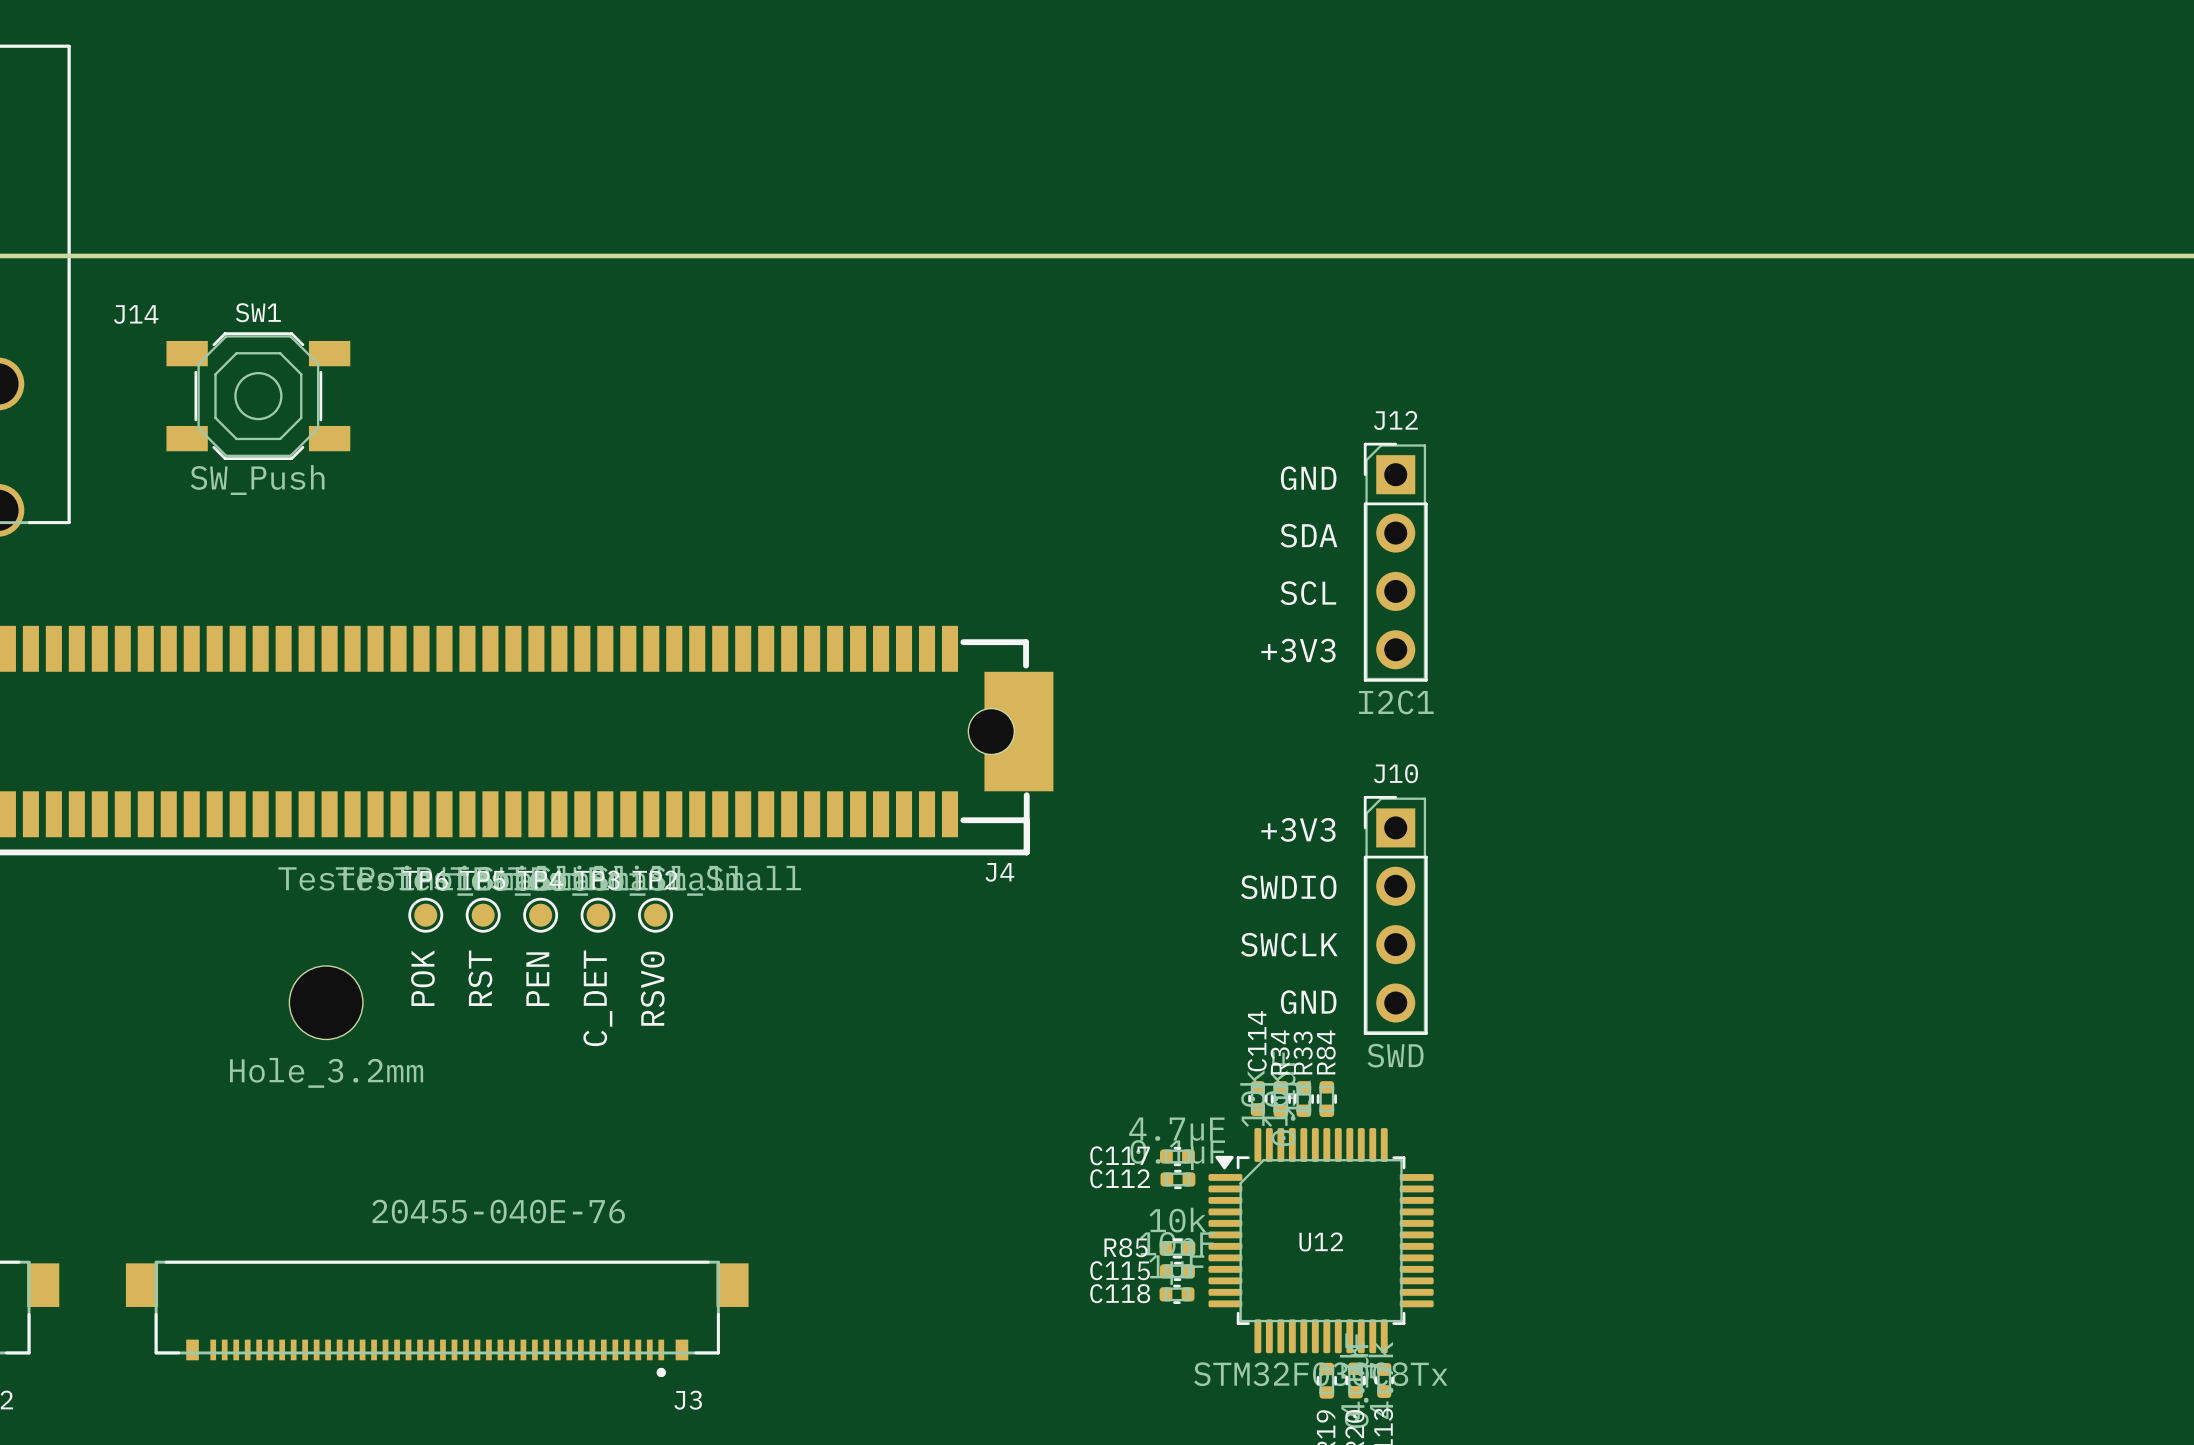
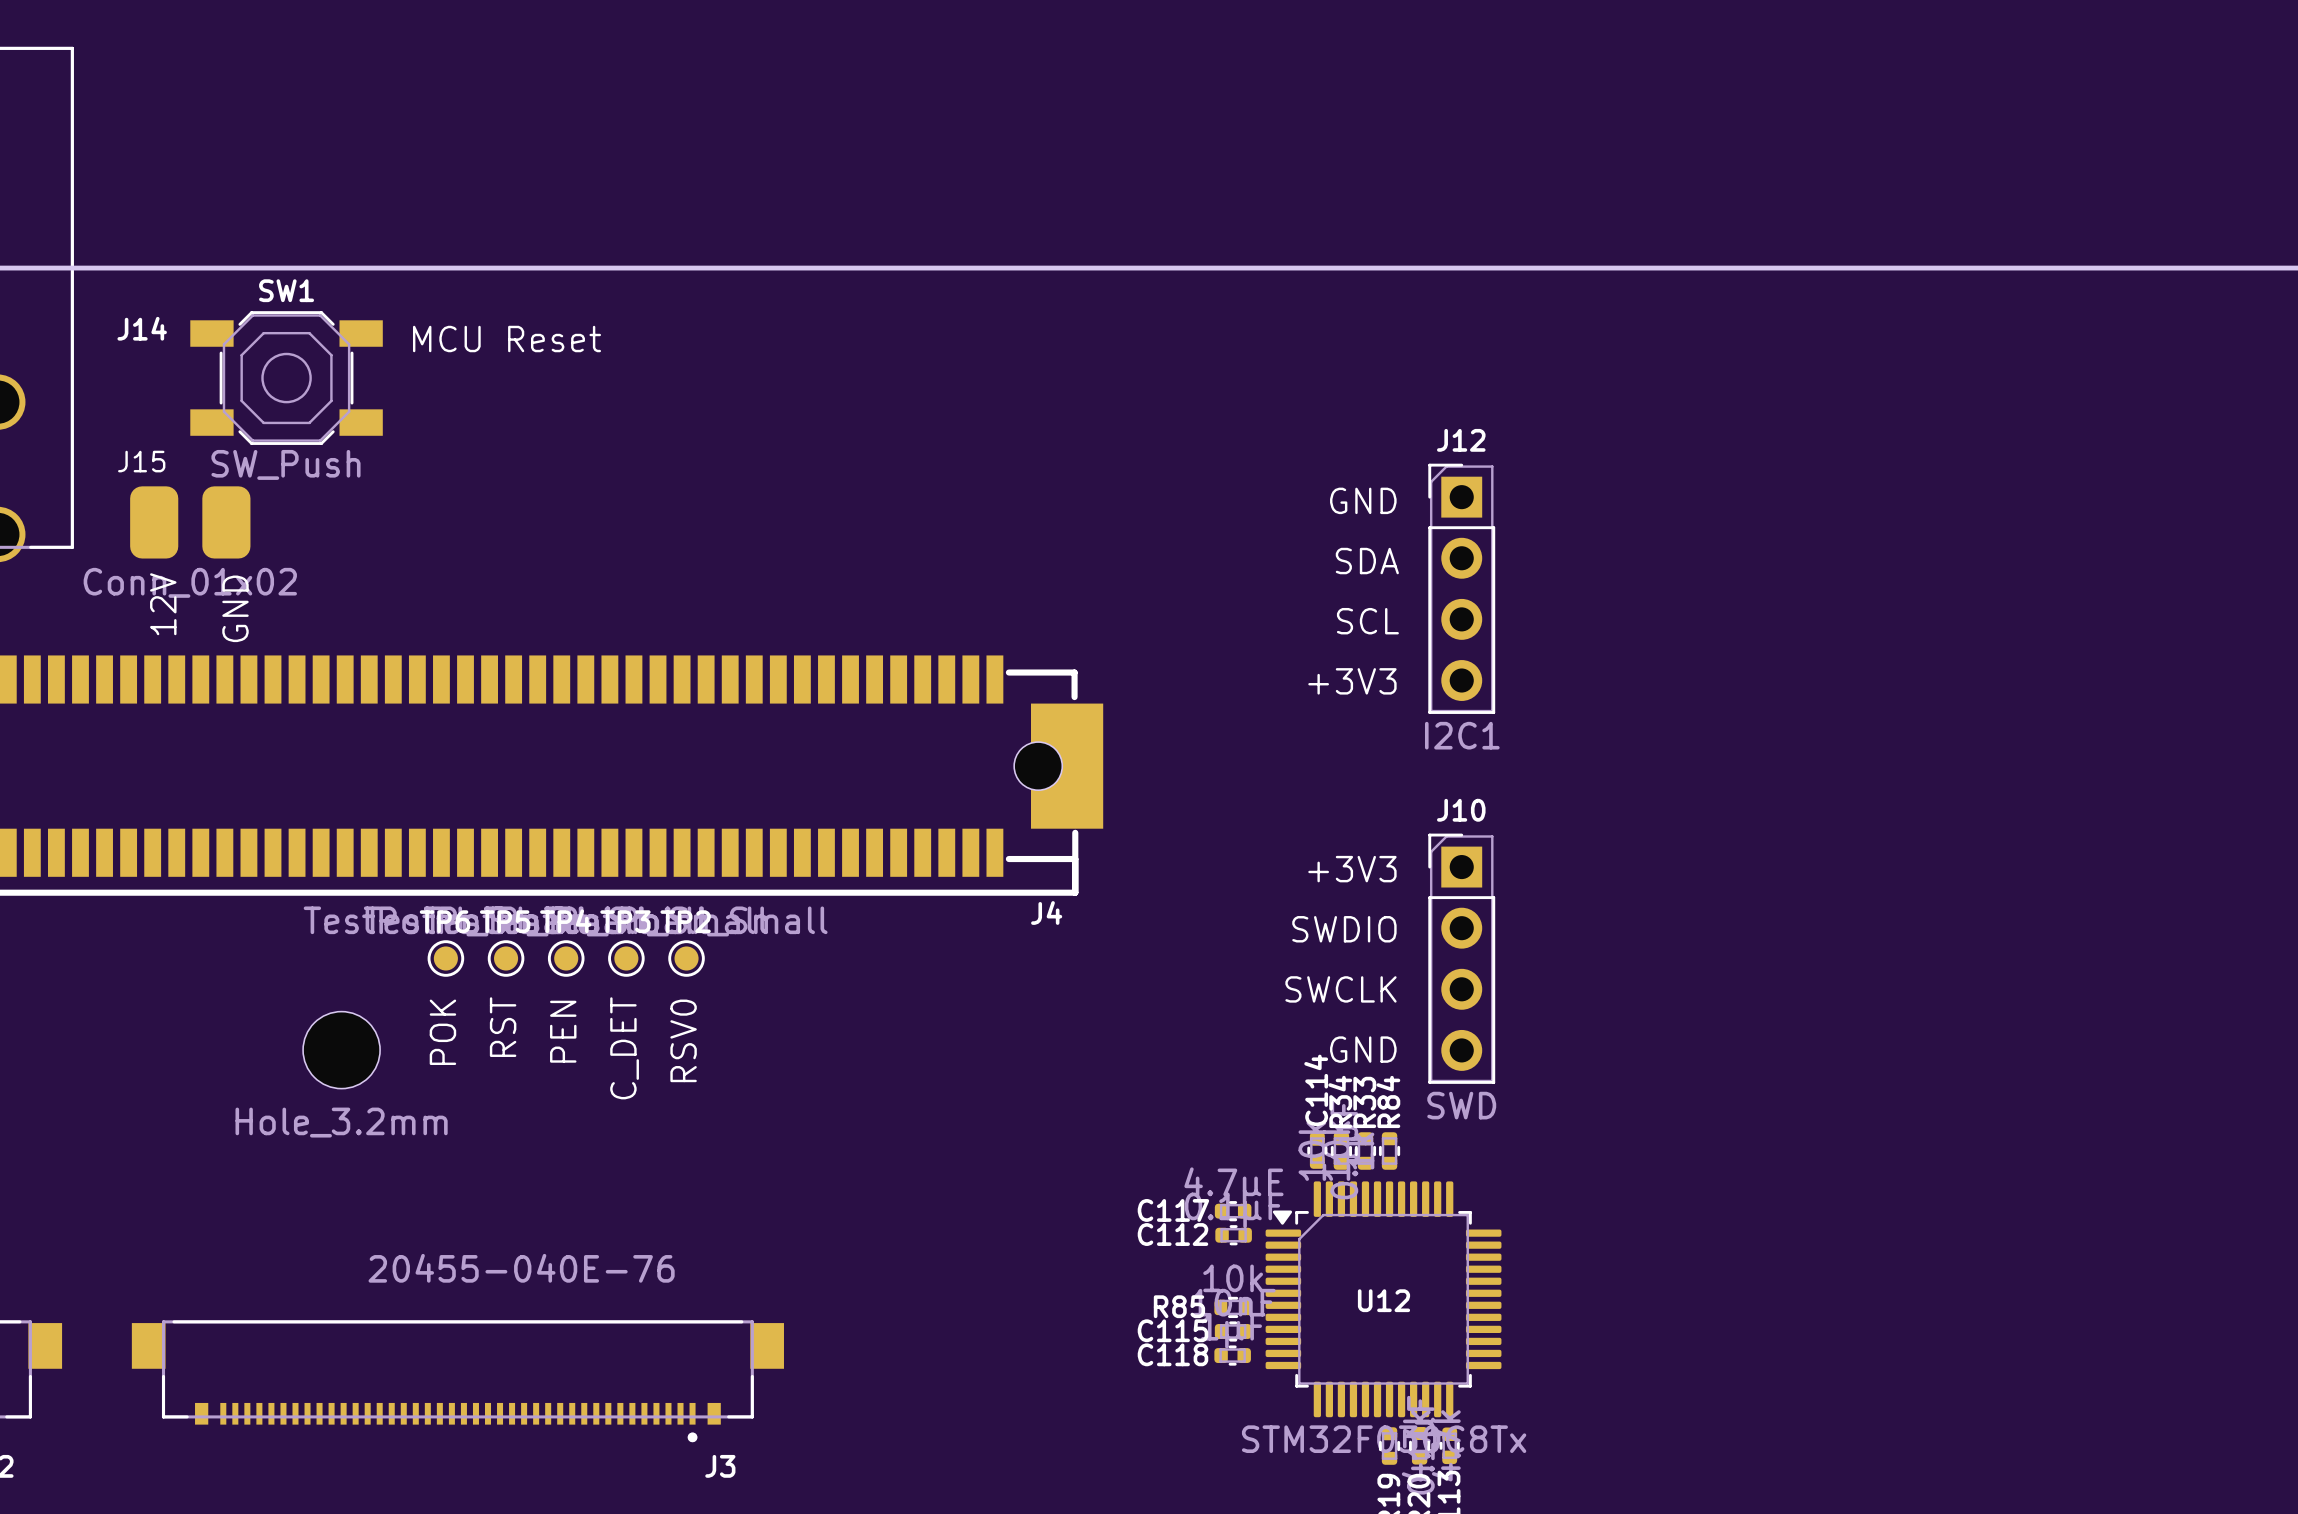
text: none -> MCU Reset (507, 339)
SW1 position: (258, 396) -> (286, 378)
J15: none -> Conn_01x02 (190, 522)
text: none -> 12V (163, 604)
text: none -> GND (235, 608)

